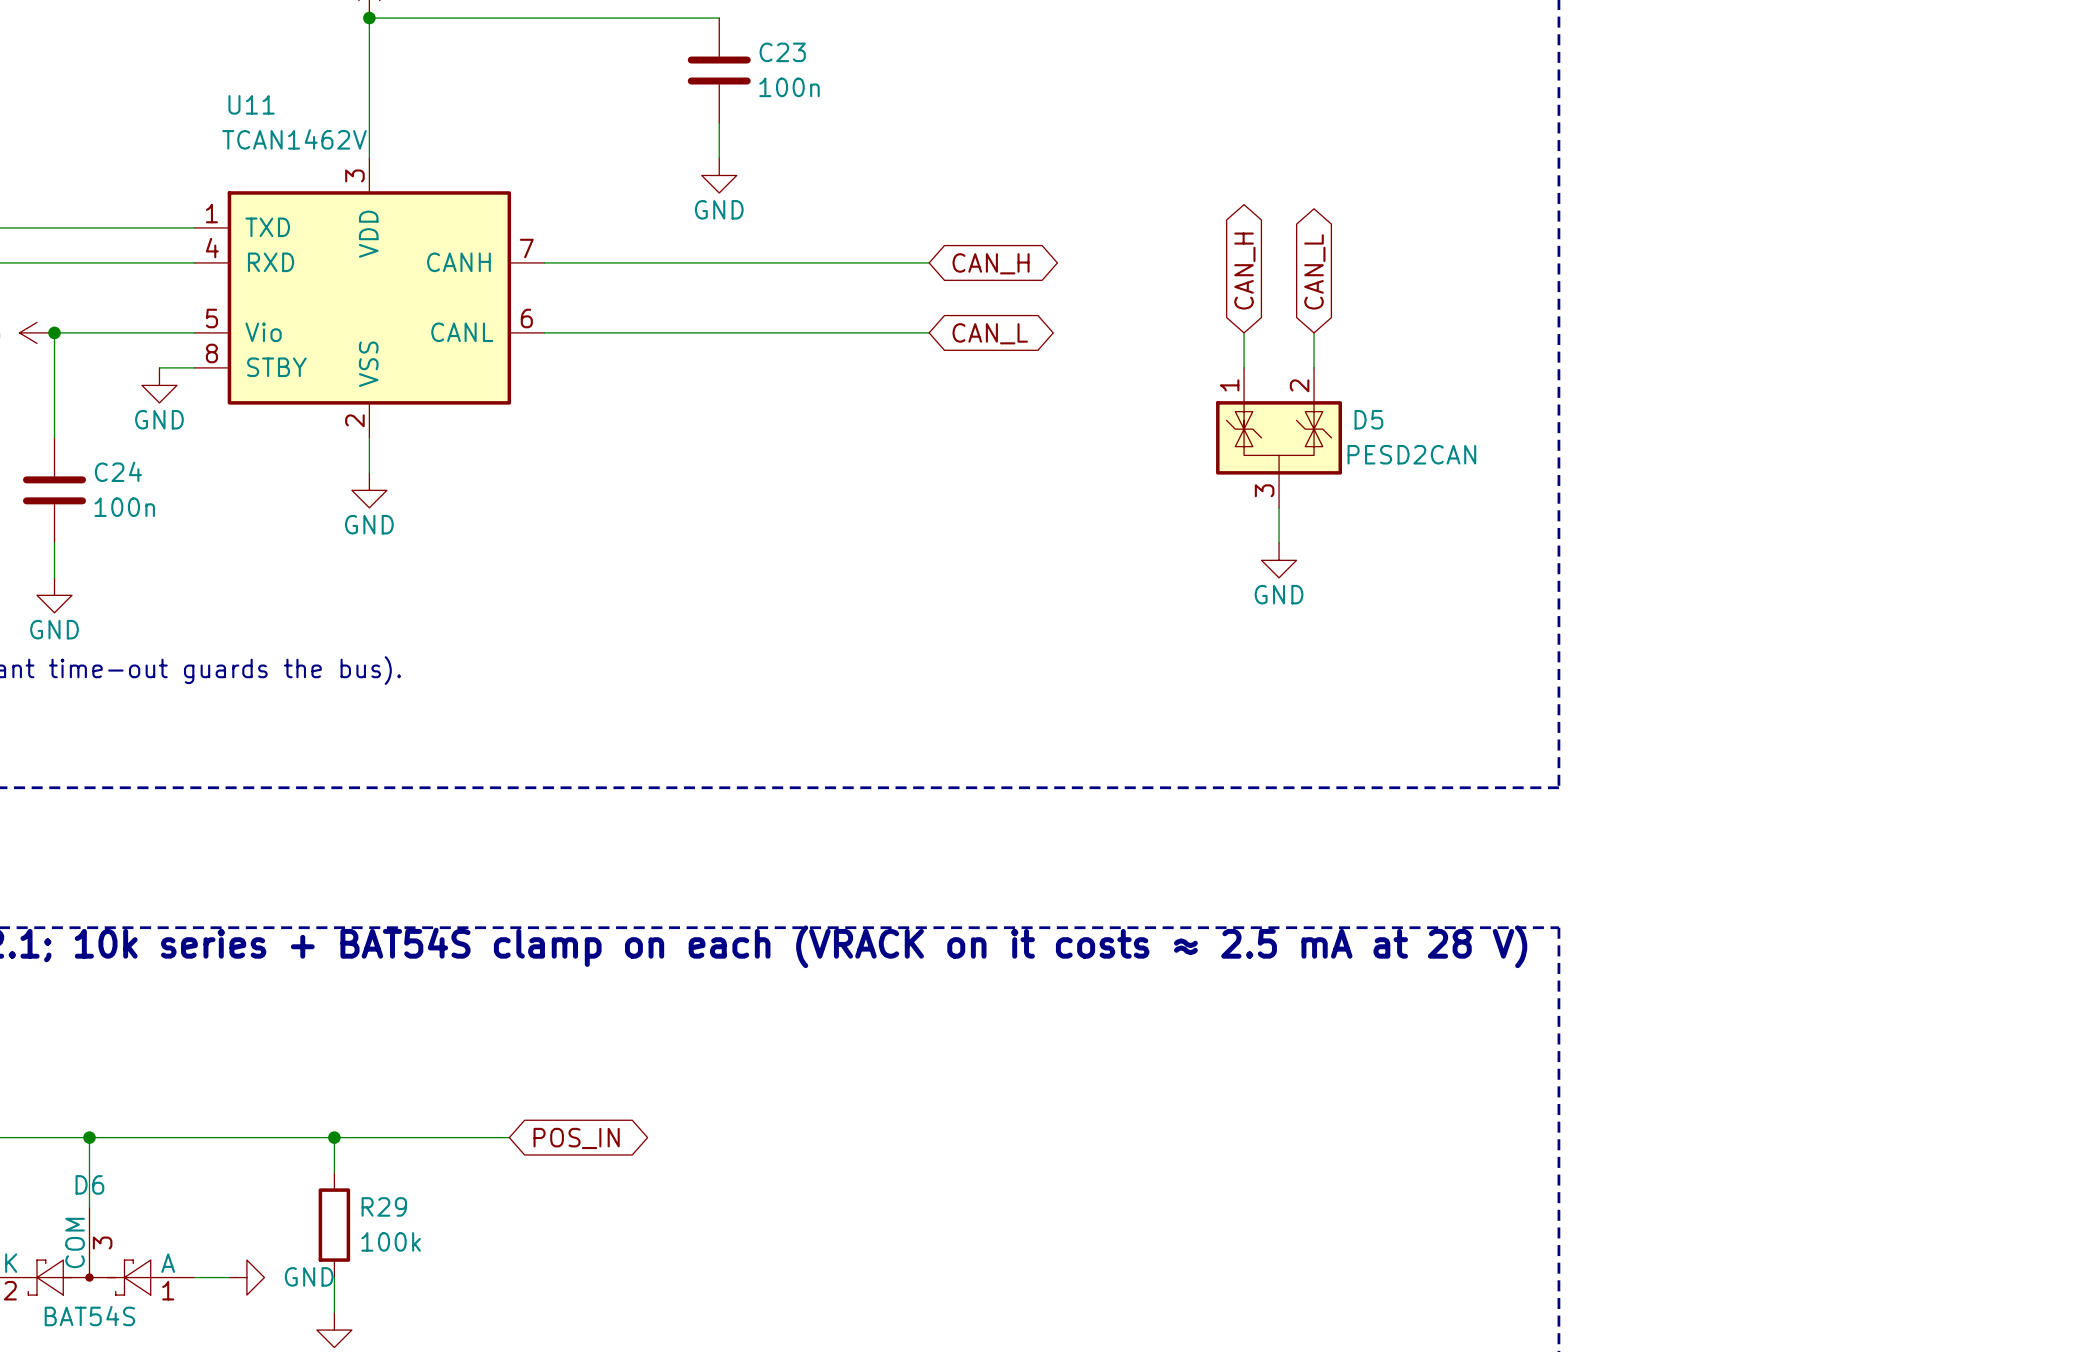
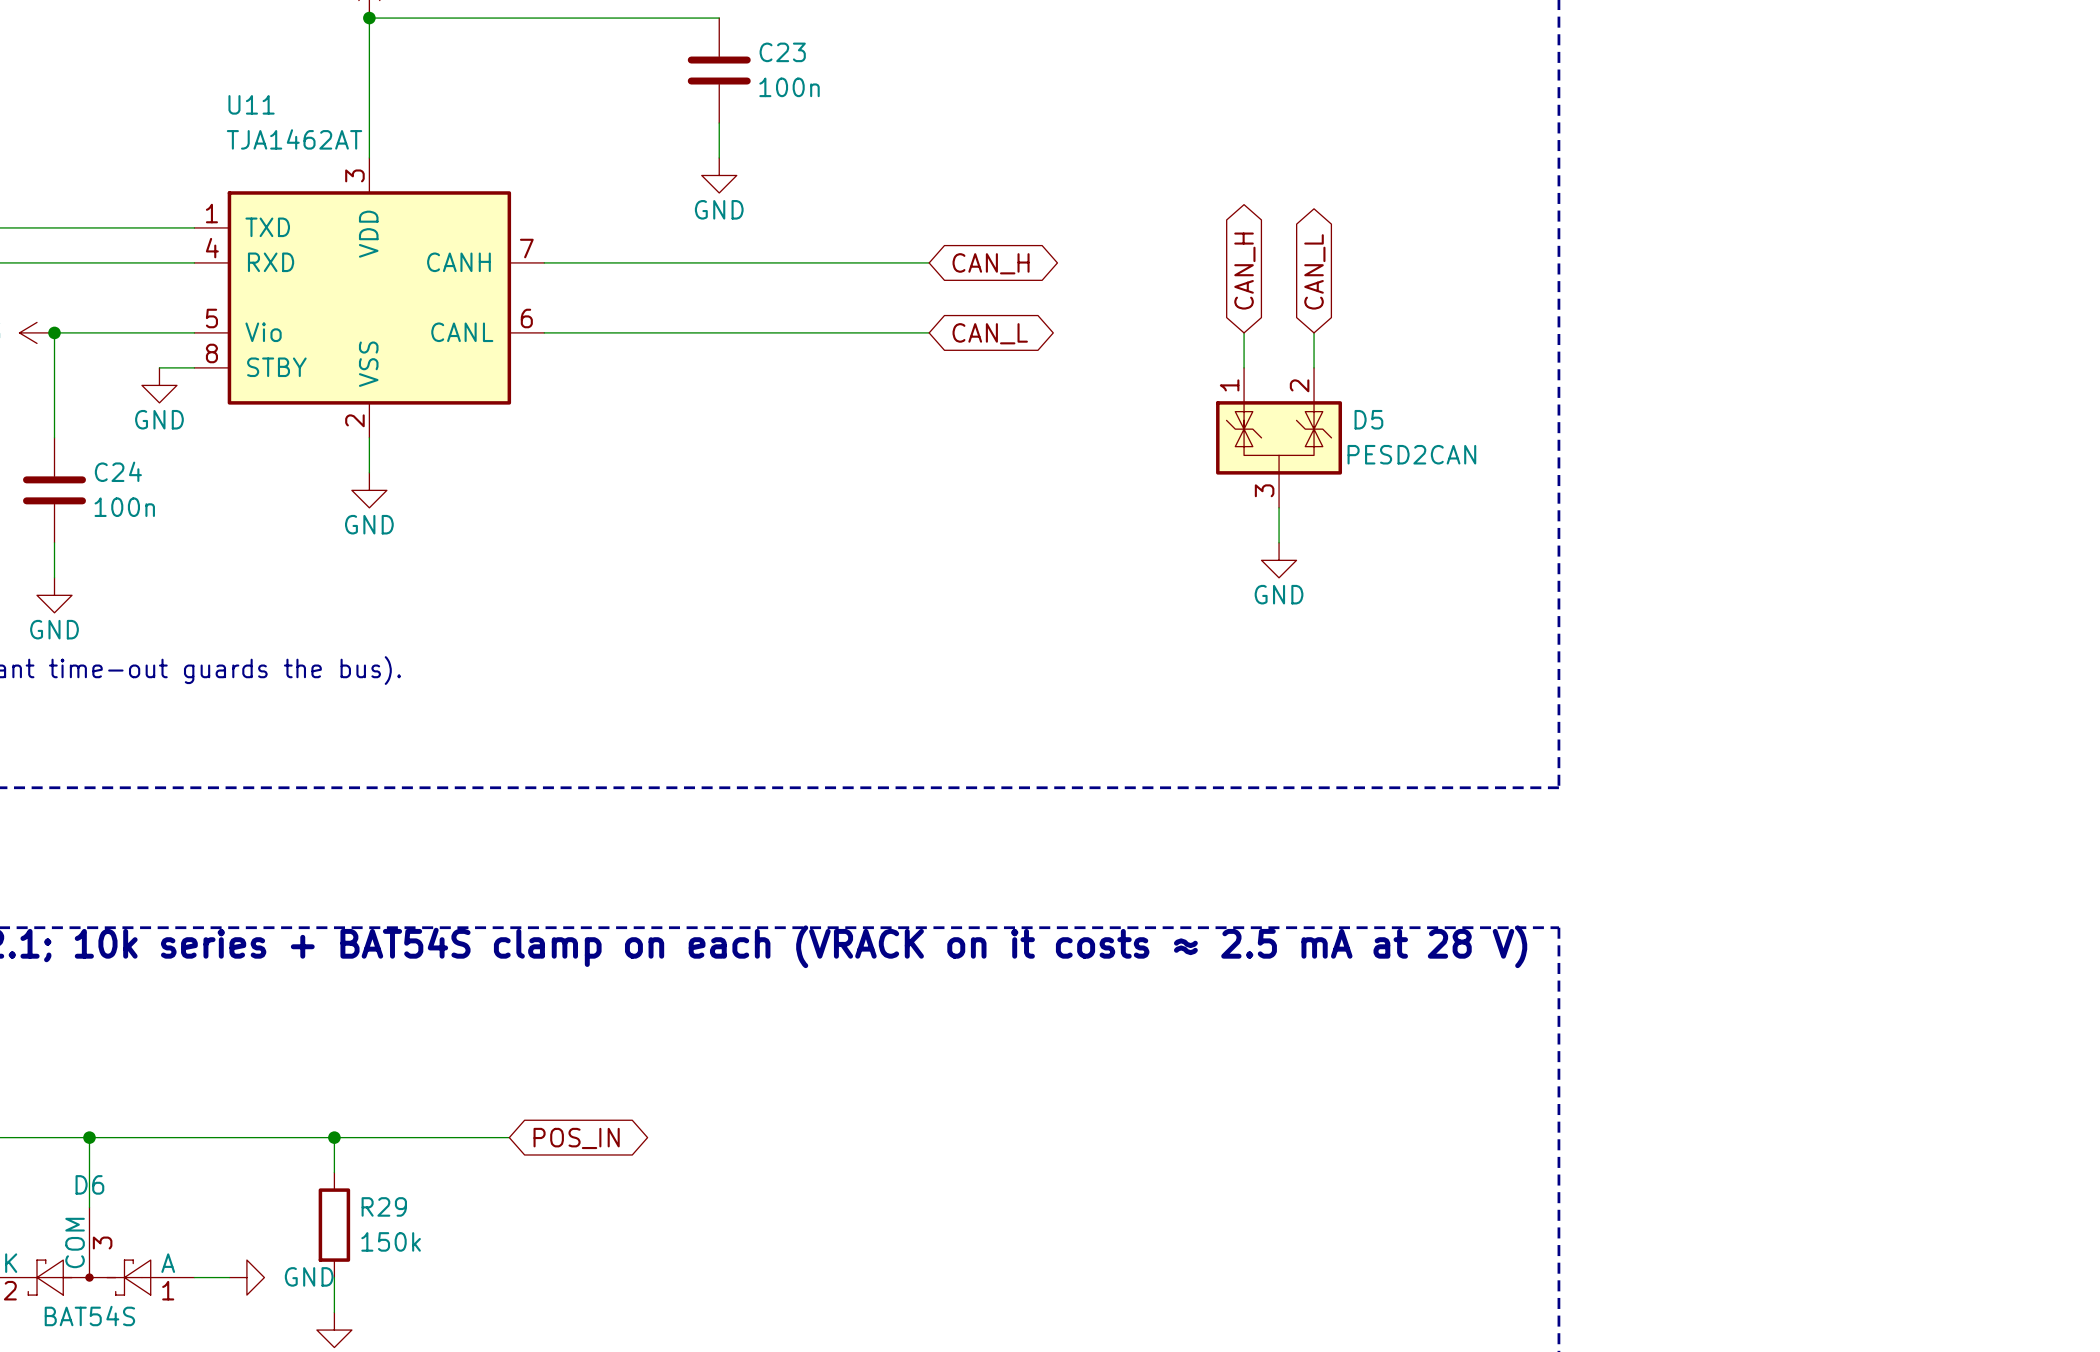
U11 value: TCAN1462V (294, 139) -> TJA1462AT (294, 139)
R29 value: 100k (391, 1241) -> 150k (391, 1241)

